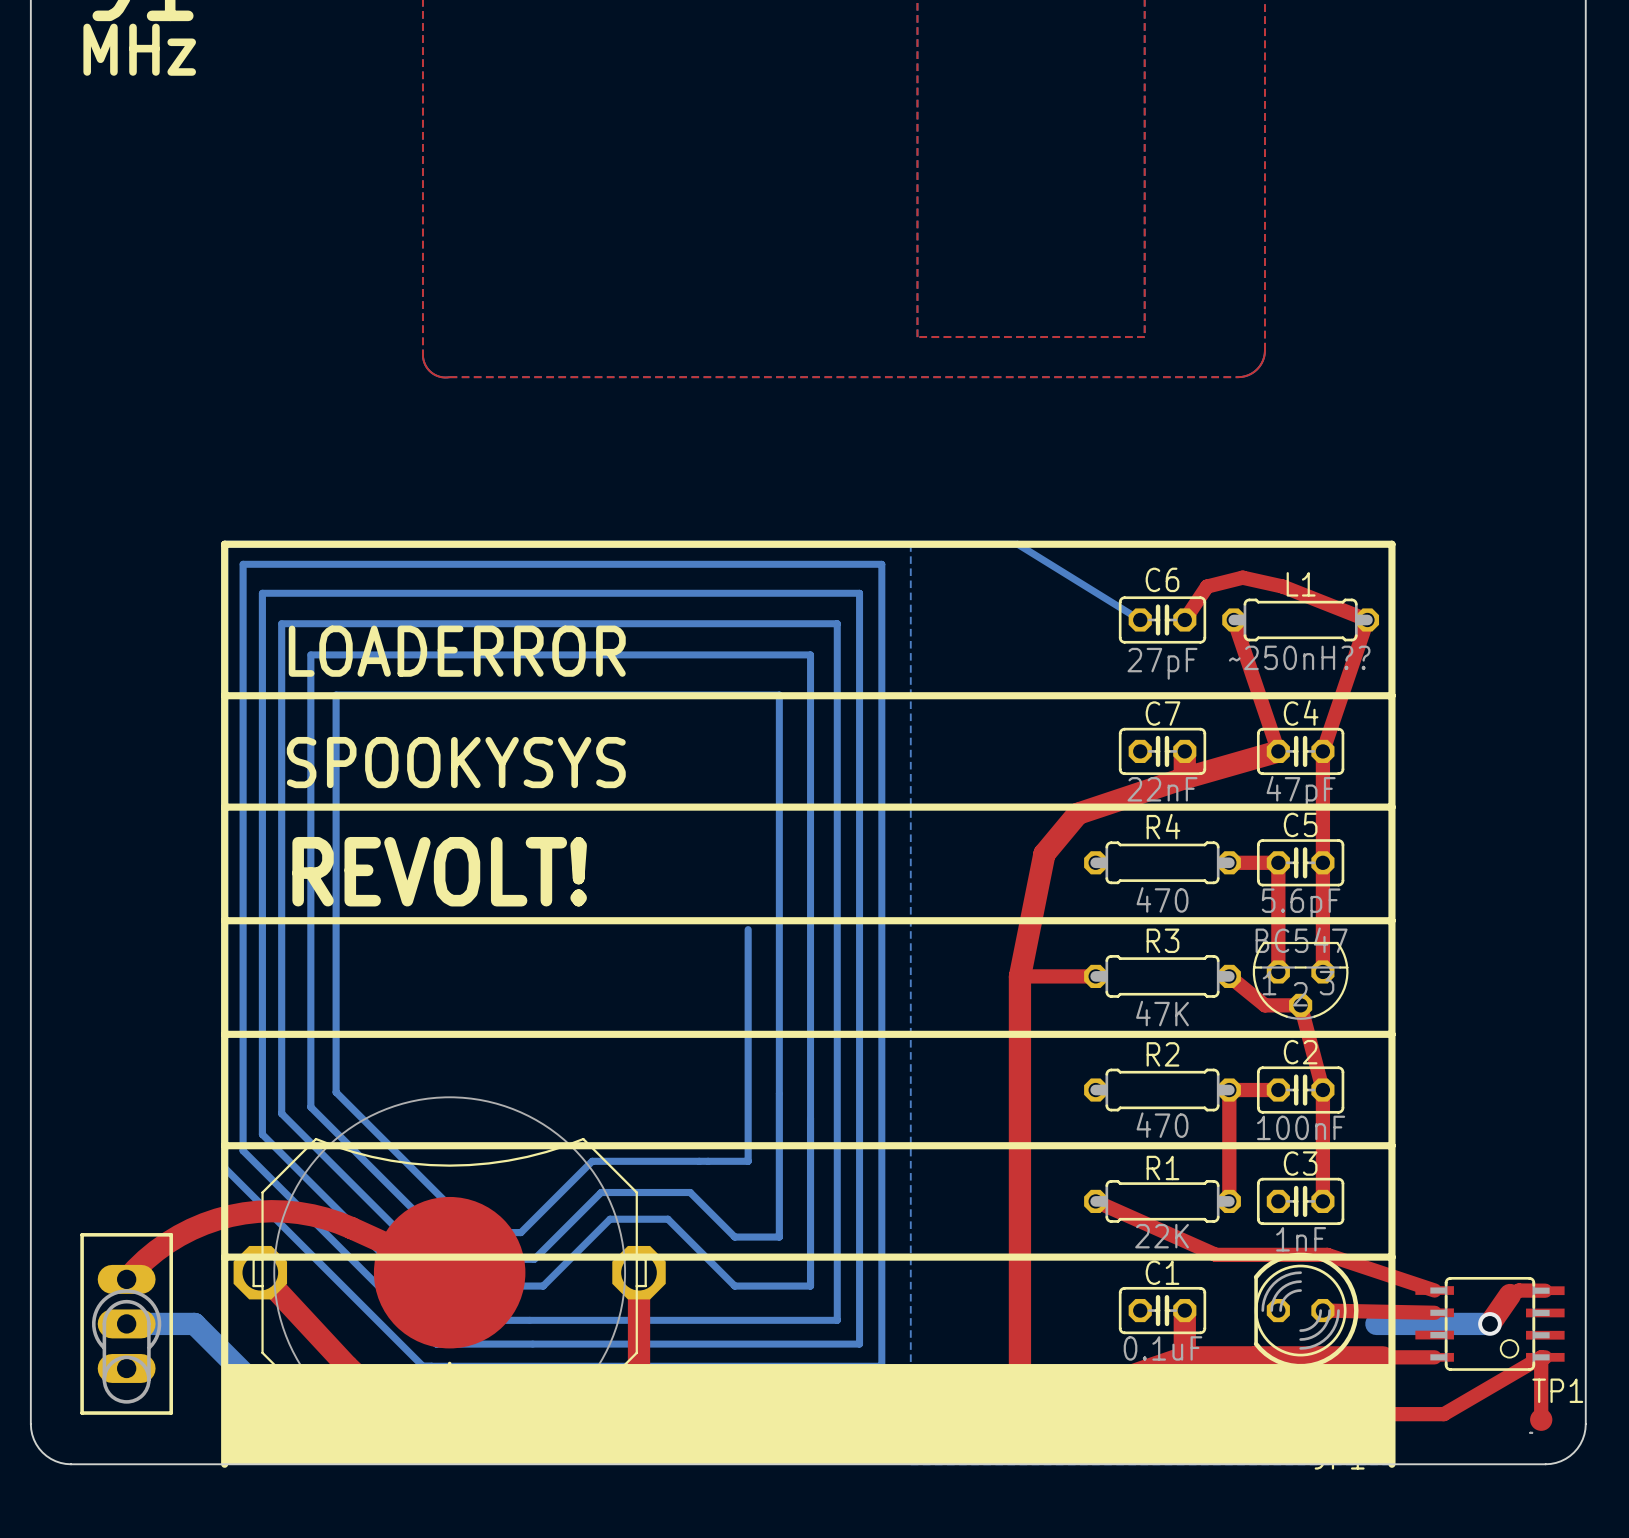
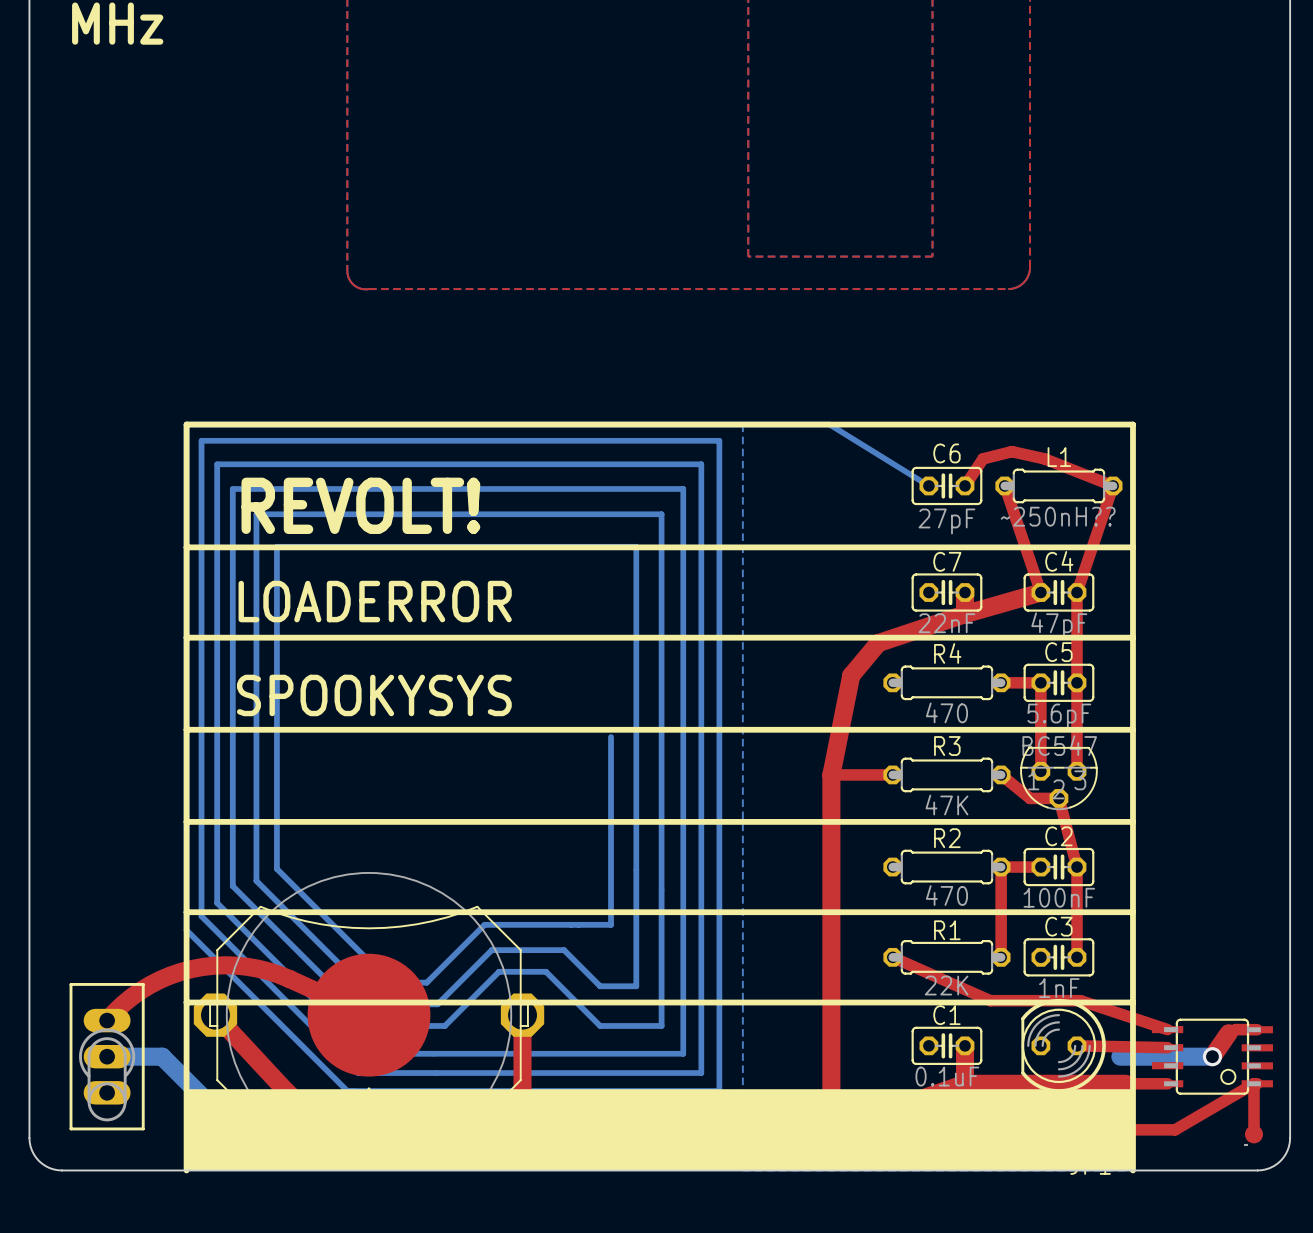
text: LOADERROR (457, 651) -> REVOLT! (360, 505)
text: SPOOKYSYS (456, 762) -> LOADERROR (375, 601)
text: REVOLT! (439, 871) -> SPOOKYSYS (374, 695)
TP1 name: TP1 (1557, 1390) -> none

